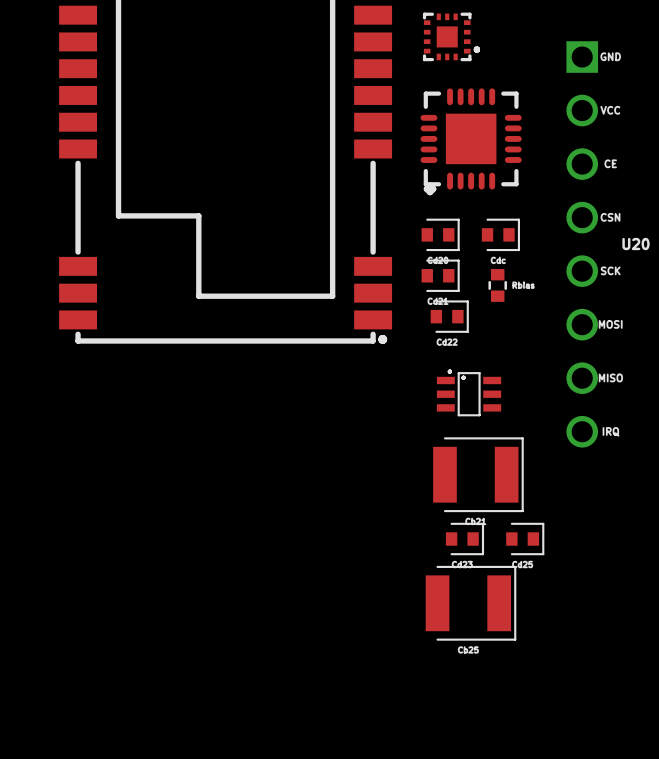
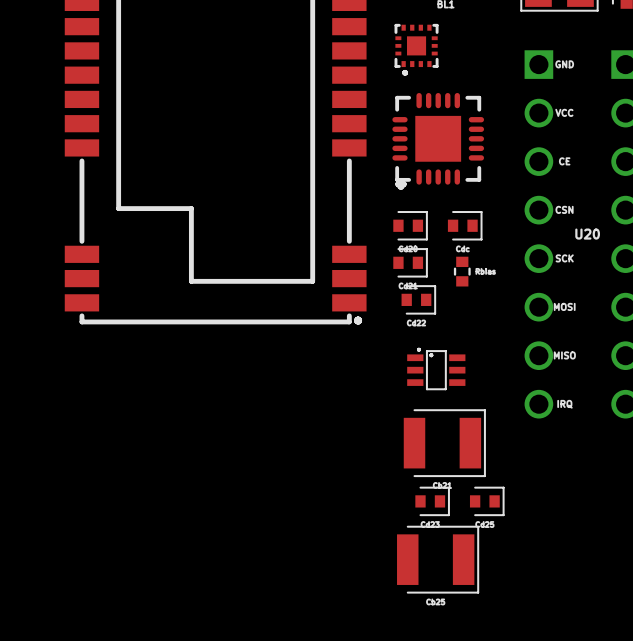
part rotation: 0° (451, 36) -> 90° clockwise (416, 49)

